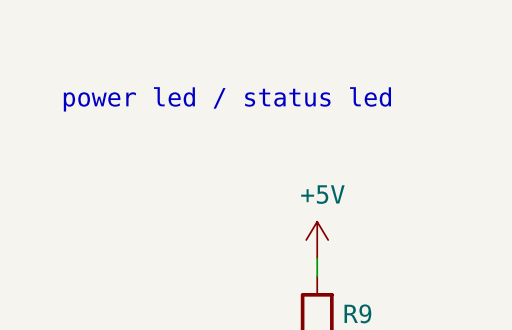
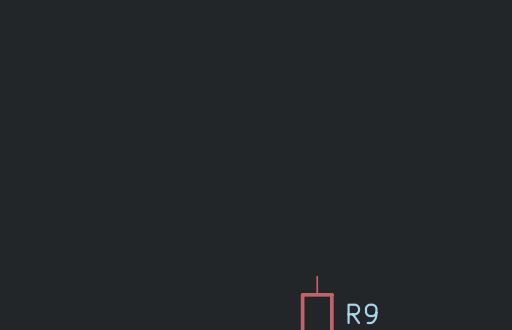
text: power led / status led (227, 99) -> none
power symbol: +5V (317, 240) -> none
wire: (317, 258) (317, 276) -> none

